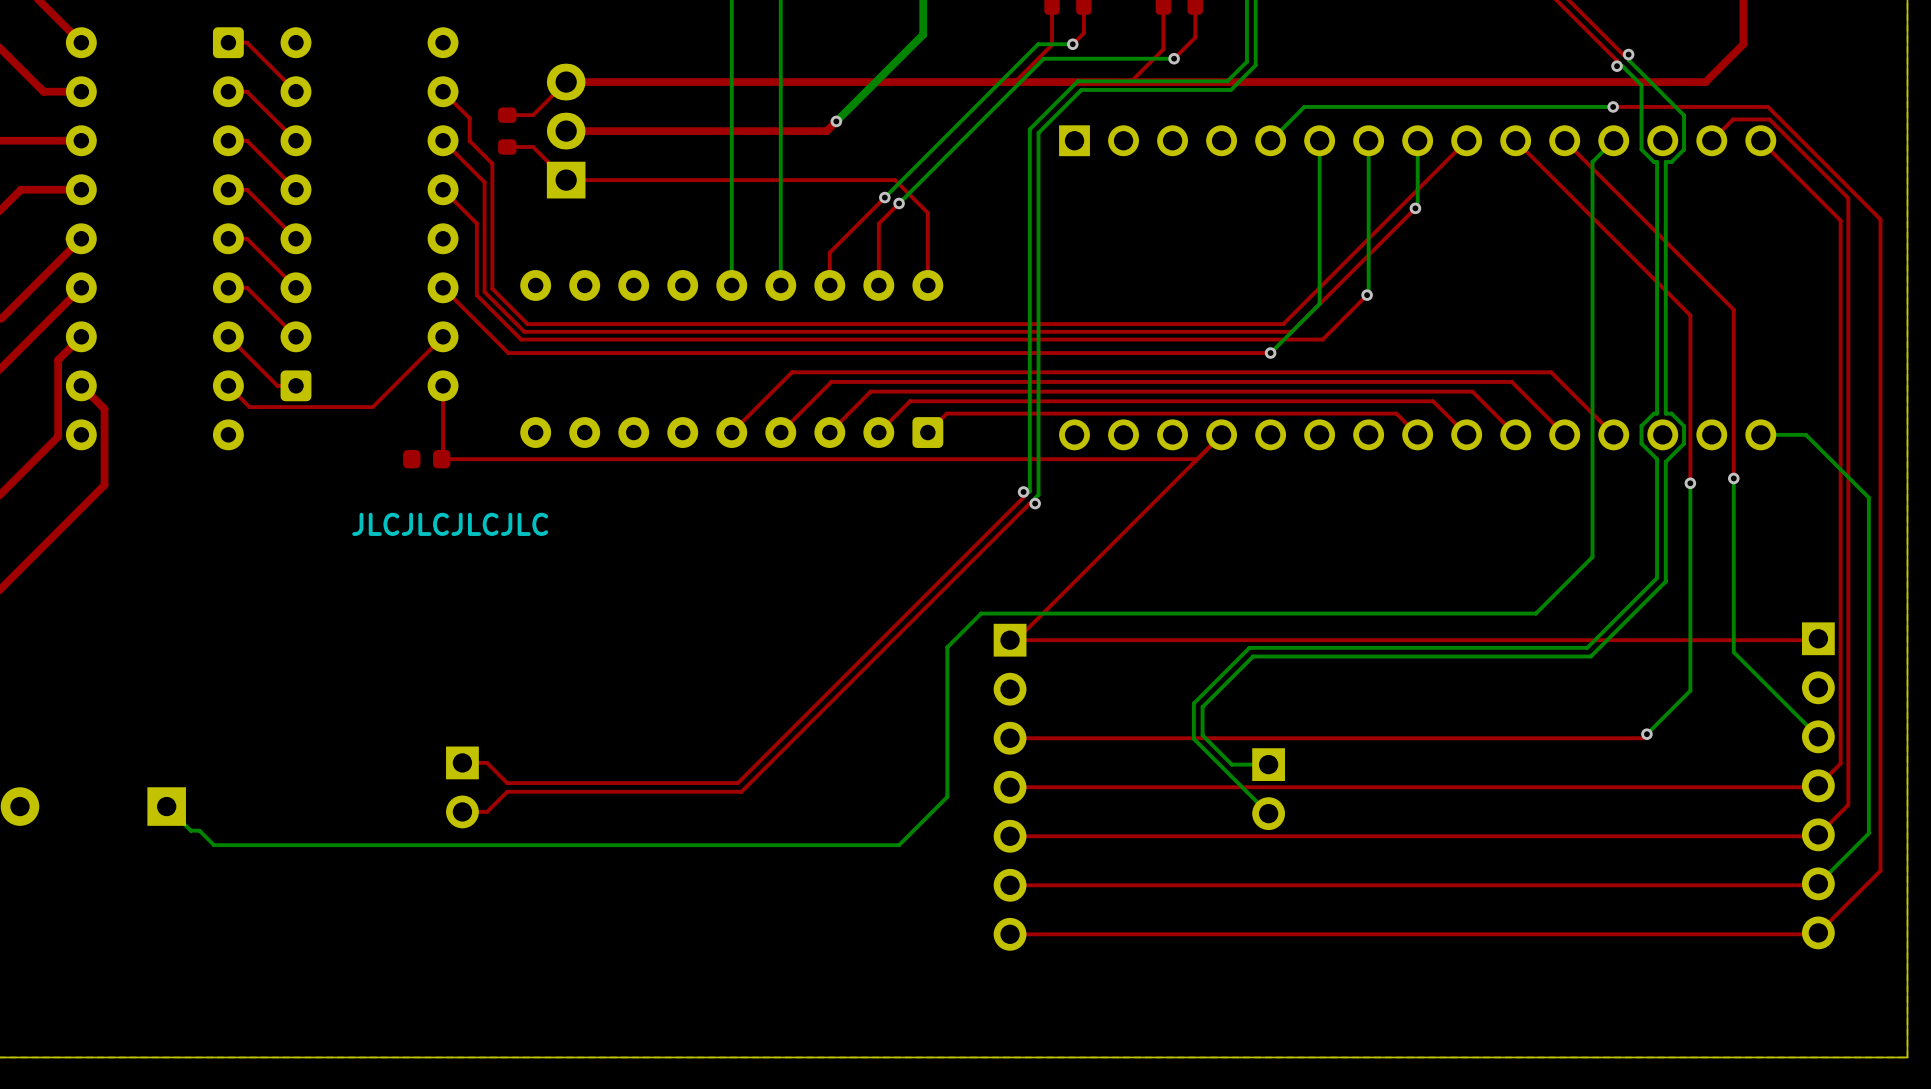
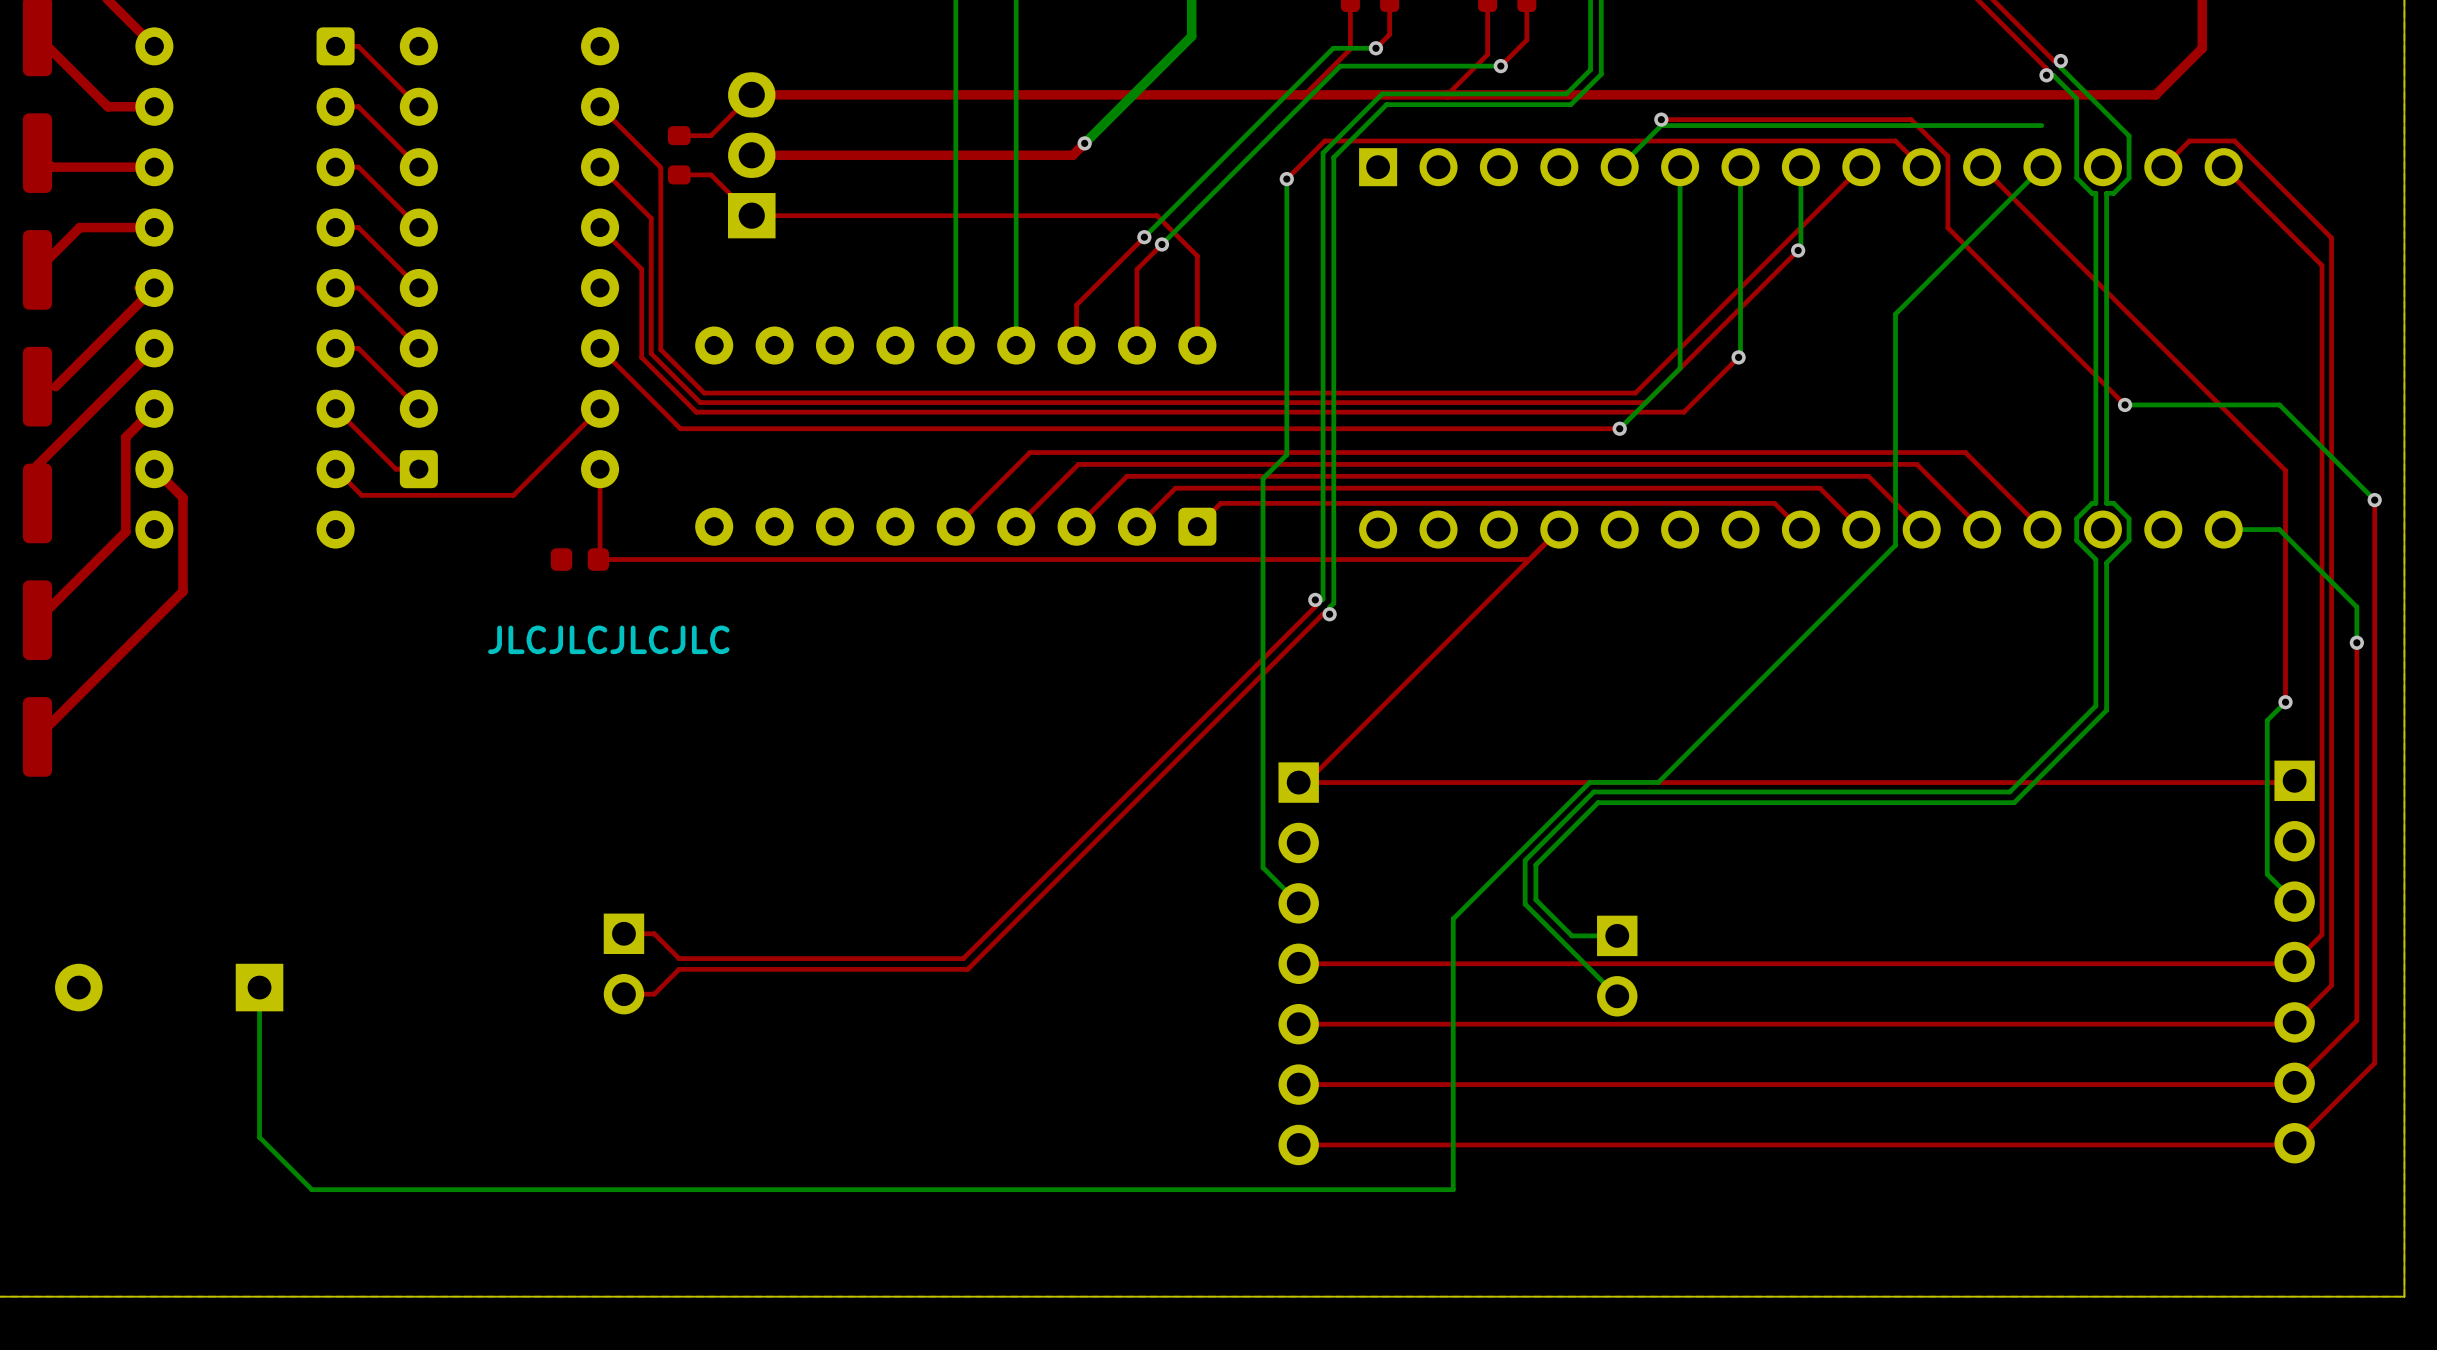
top track: none -> (1661, 119) (1911, 119) (1947, 156) (1947, 227) (2125, 404)
via: none -> (1661, 119)
top track: (1613, 106) (1768, 106) (1880, 219) (1880, 870) -> (2374, 500) (2374, 1063) (2371, 1066)
via: (1613, 106) -> none
top track: (469, 118) (469, 141) (492, 163) -> (632, 139) (660, 167) (660, 195)
top track: (1515, 140) (1690, 315) (1690, 483) -> (1921, 167) (1895, 140) (1324, 140) (1286, 179)
bottom track: none -> (1286, 179) (1286, 454) (1263, 478) (1263, 867) (1298, 903)
via: none -> (1286, 179)
bottom track: (1592, 161) (1592, 557) (1535, 613) (981, 613) (947, 647) (947, 796) (899, 845) (213, 845) (199, 830) (190, 830) (166, 806) -> (2016, 193) (1895, 314) (1895, 545) (1658, 782) (1589, 782) (1453, 918) (1453, 1189) (311, 1189) (259, 1137) (259, 987)
top track: (1733, 309) (1733, 478) -> (2190, 375) (2285, 470) (2285, 702)
bottom track: none -> (2125, 404) (2279, 404) (2374, 500)
via: none -> (2125, 404)
via: none -> (2374, 500)
bottom track: (1733, 478) (1733, 652) (1796, 714) -> (2285, 702) (2267, 720) (2267, 874)
via: (1733, 478) -> none
bottom track: (1690, 483) (1690, 690) (1646, 734) -> none
via: (1690, 483) -> none
top track: none -> (2356, 642) (2356, 1020) (2294, 1082)
bottom track: (1868, 526) (1868, 833) (1818, 883) -> none
via: none -> (2356, 642)
via: none -> (2285, 702)
top track: (1646, 734) (1642, 738) (1010, 738) -> none
via: (1646, 734) -> none

